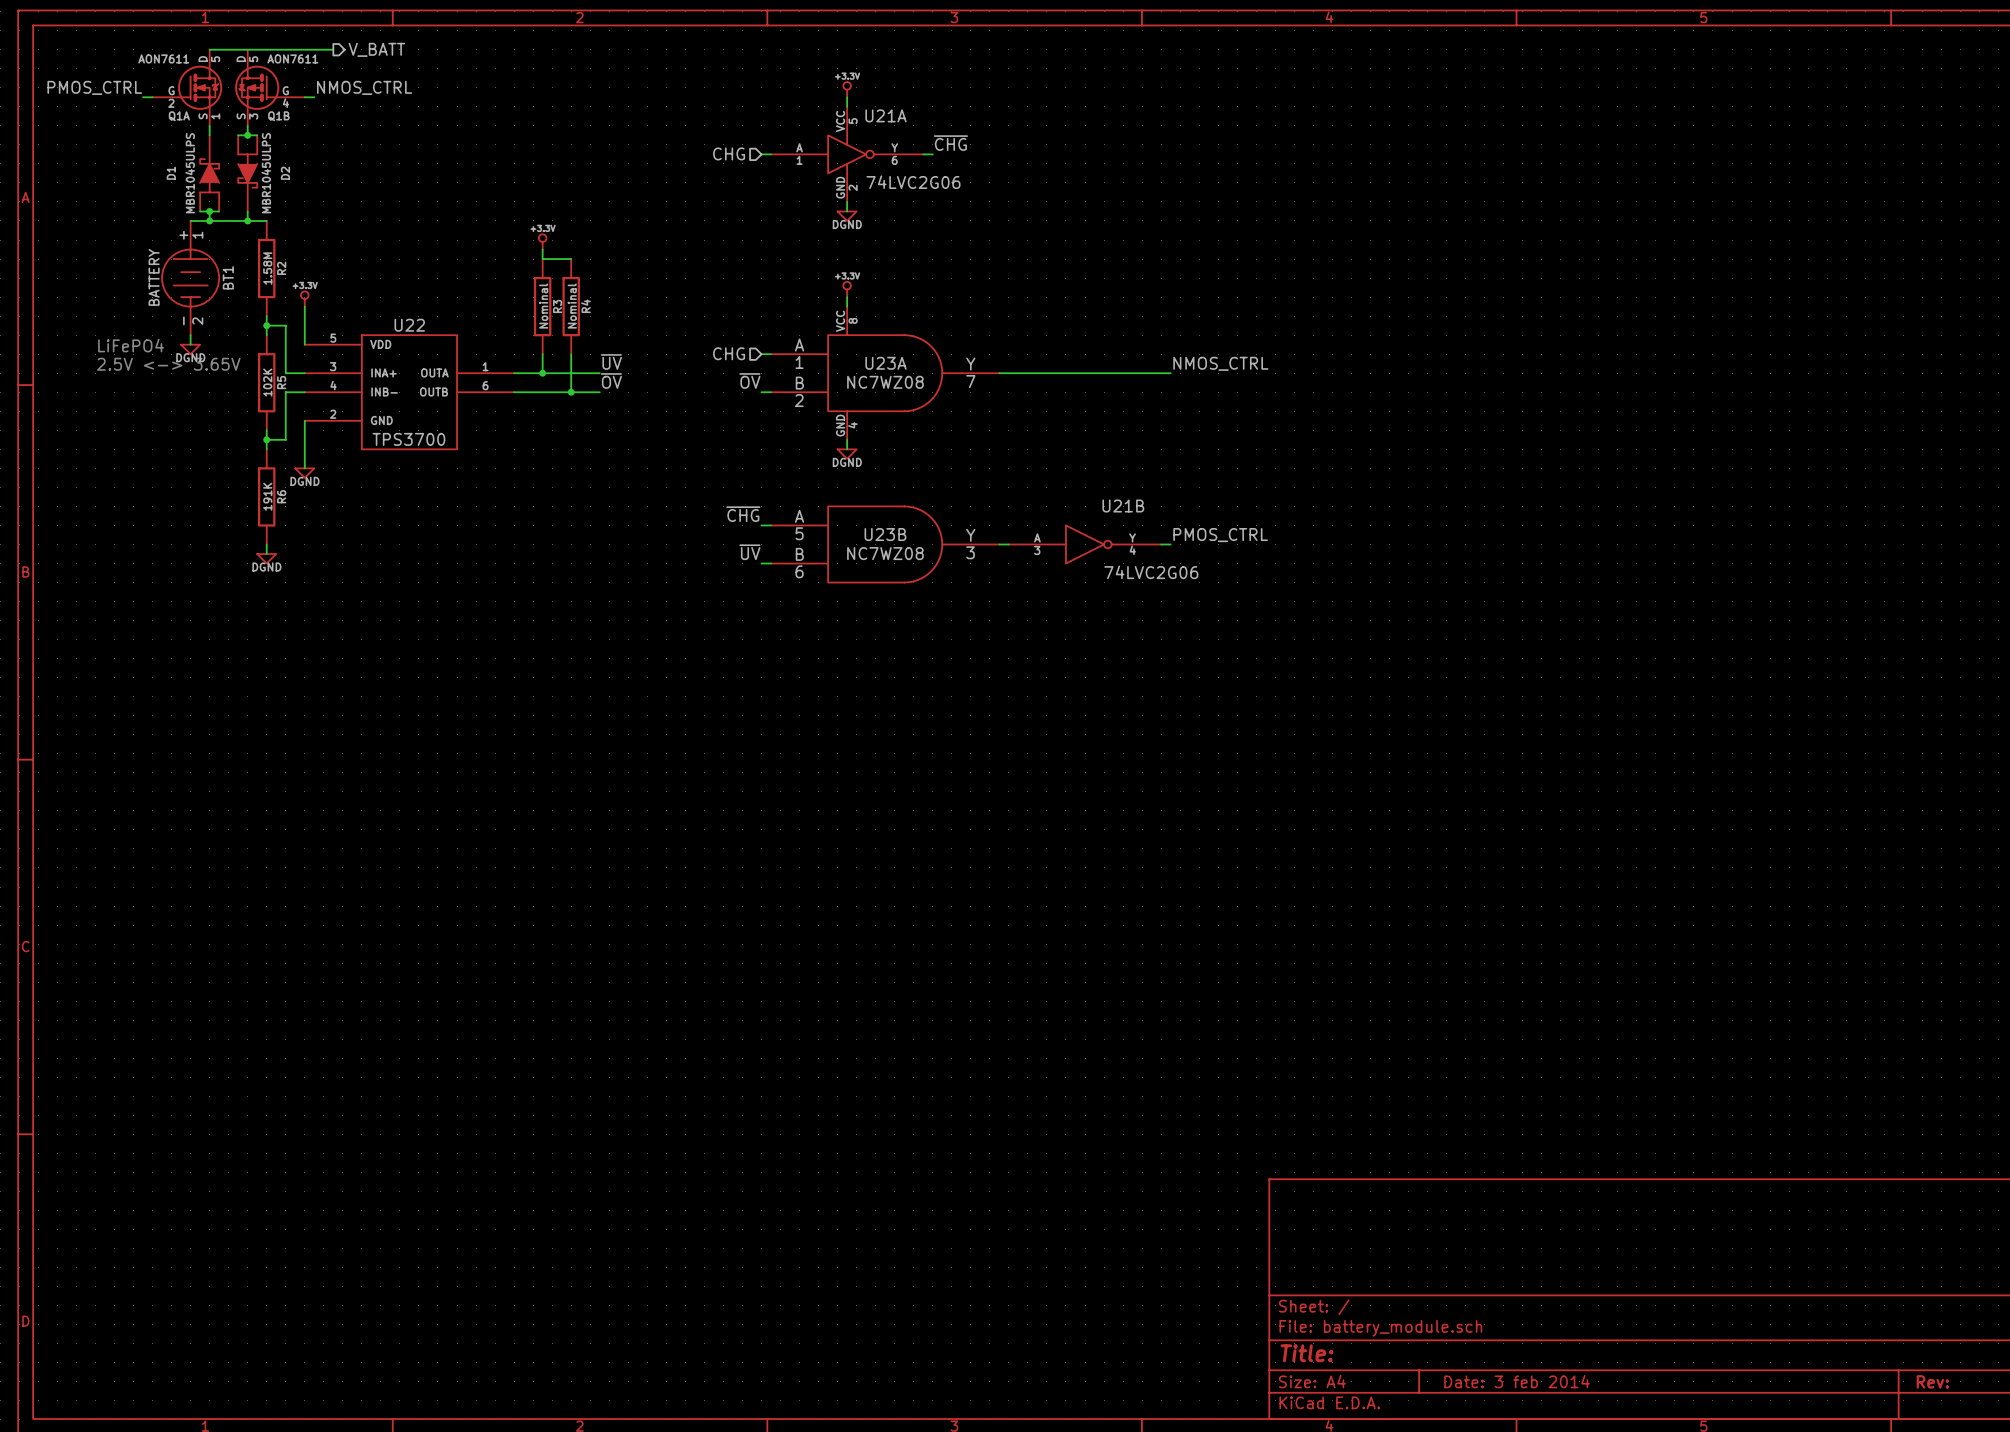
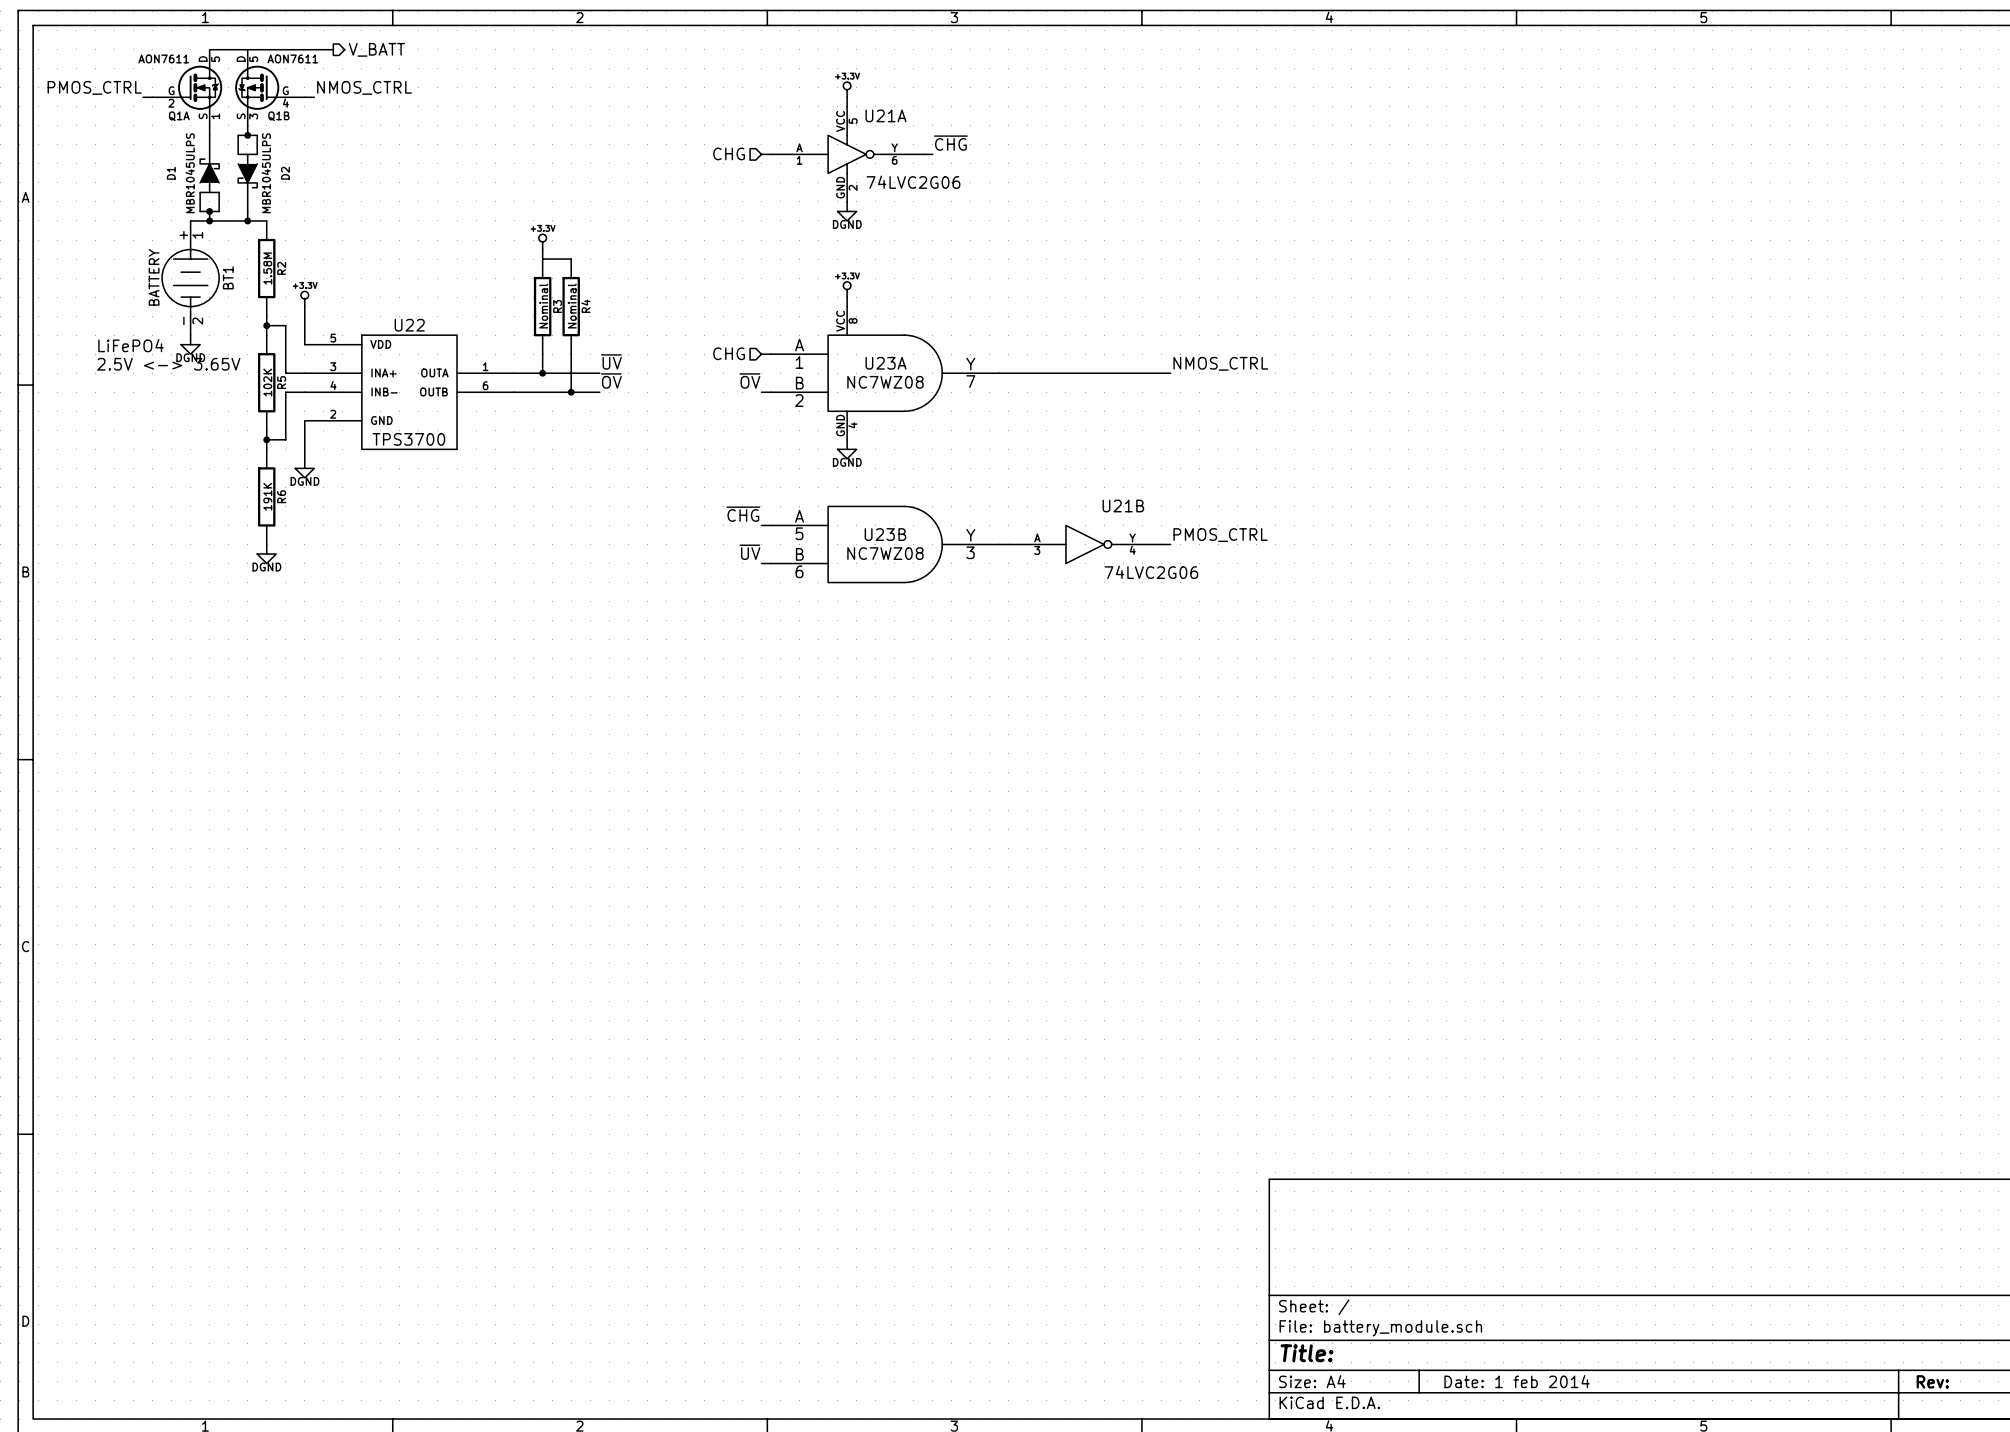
title block: Date: 3 feb 2014 (1517, 1381) -> Date: 1 feb 2014 (1517, 1381)

